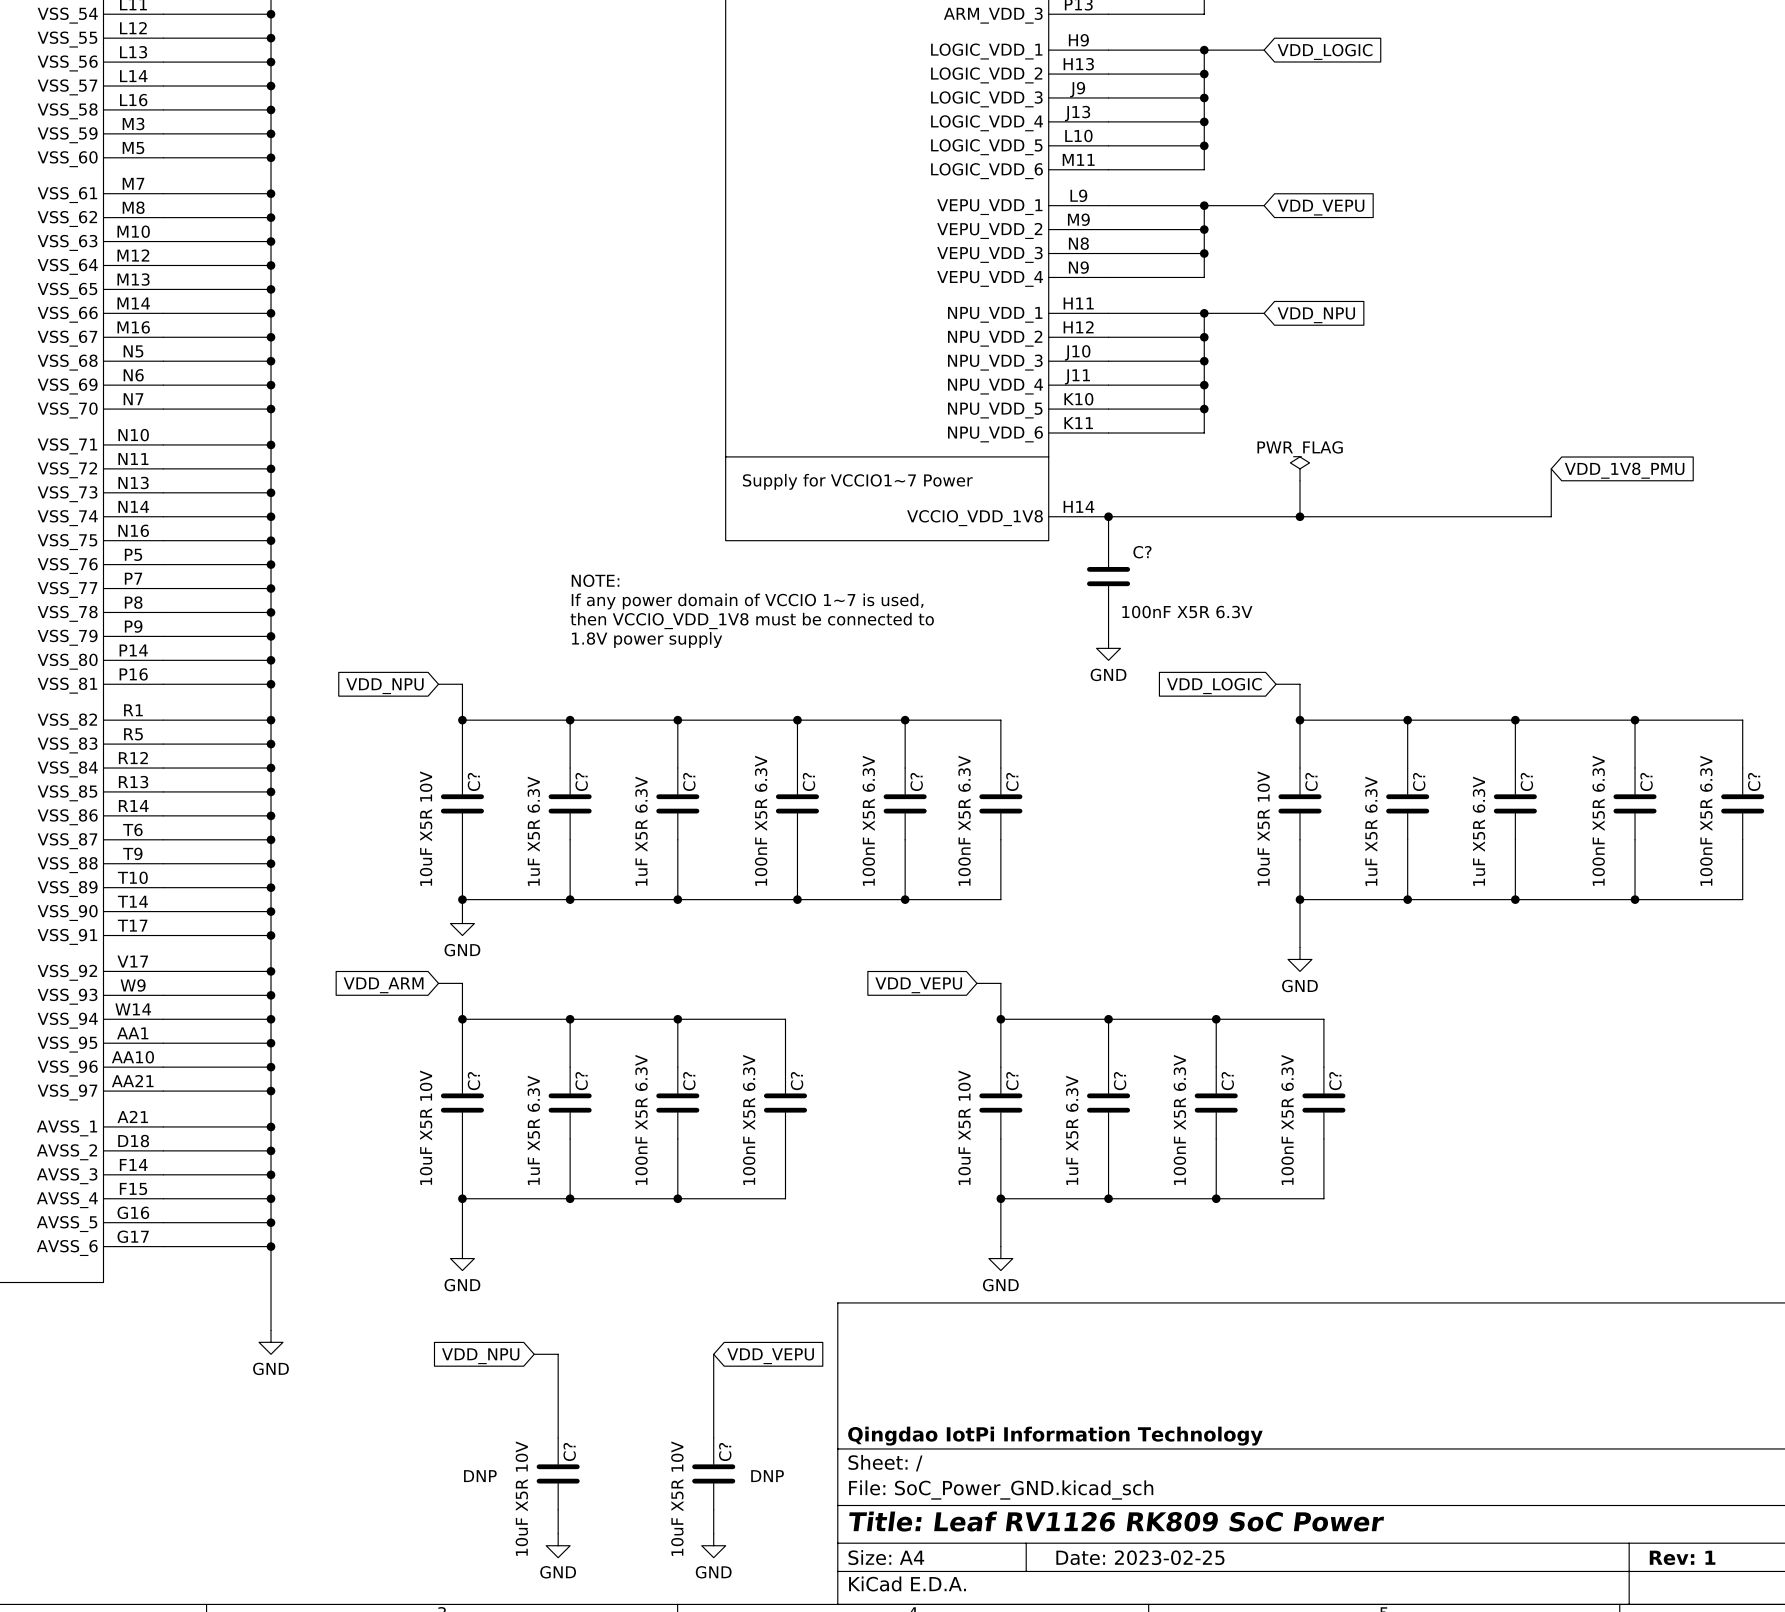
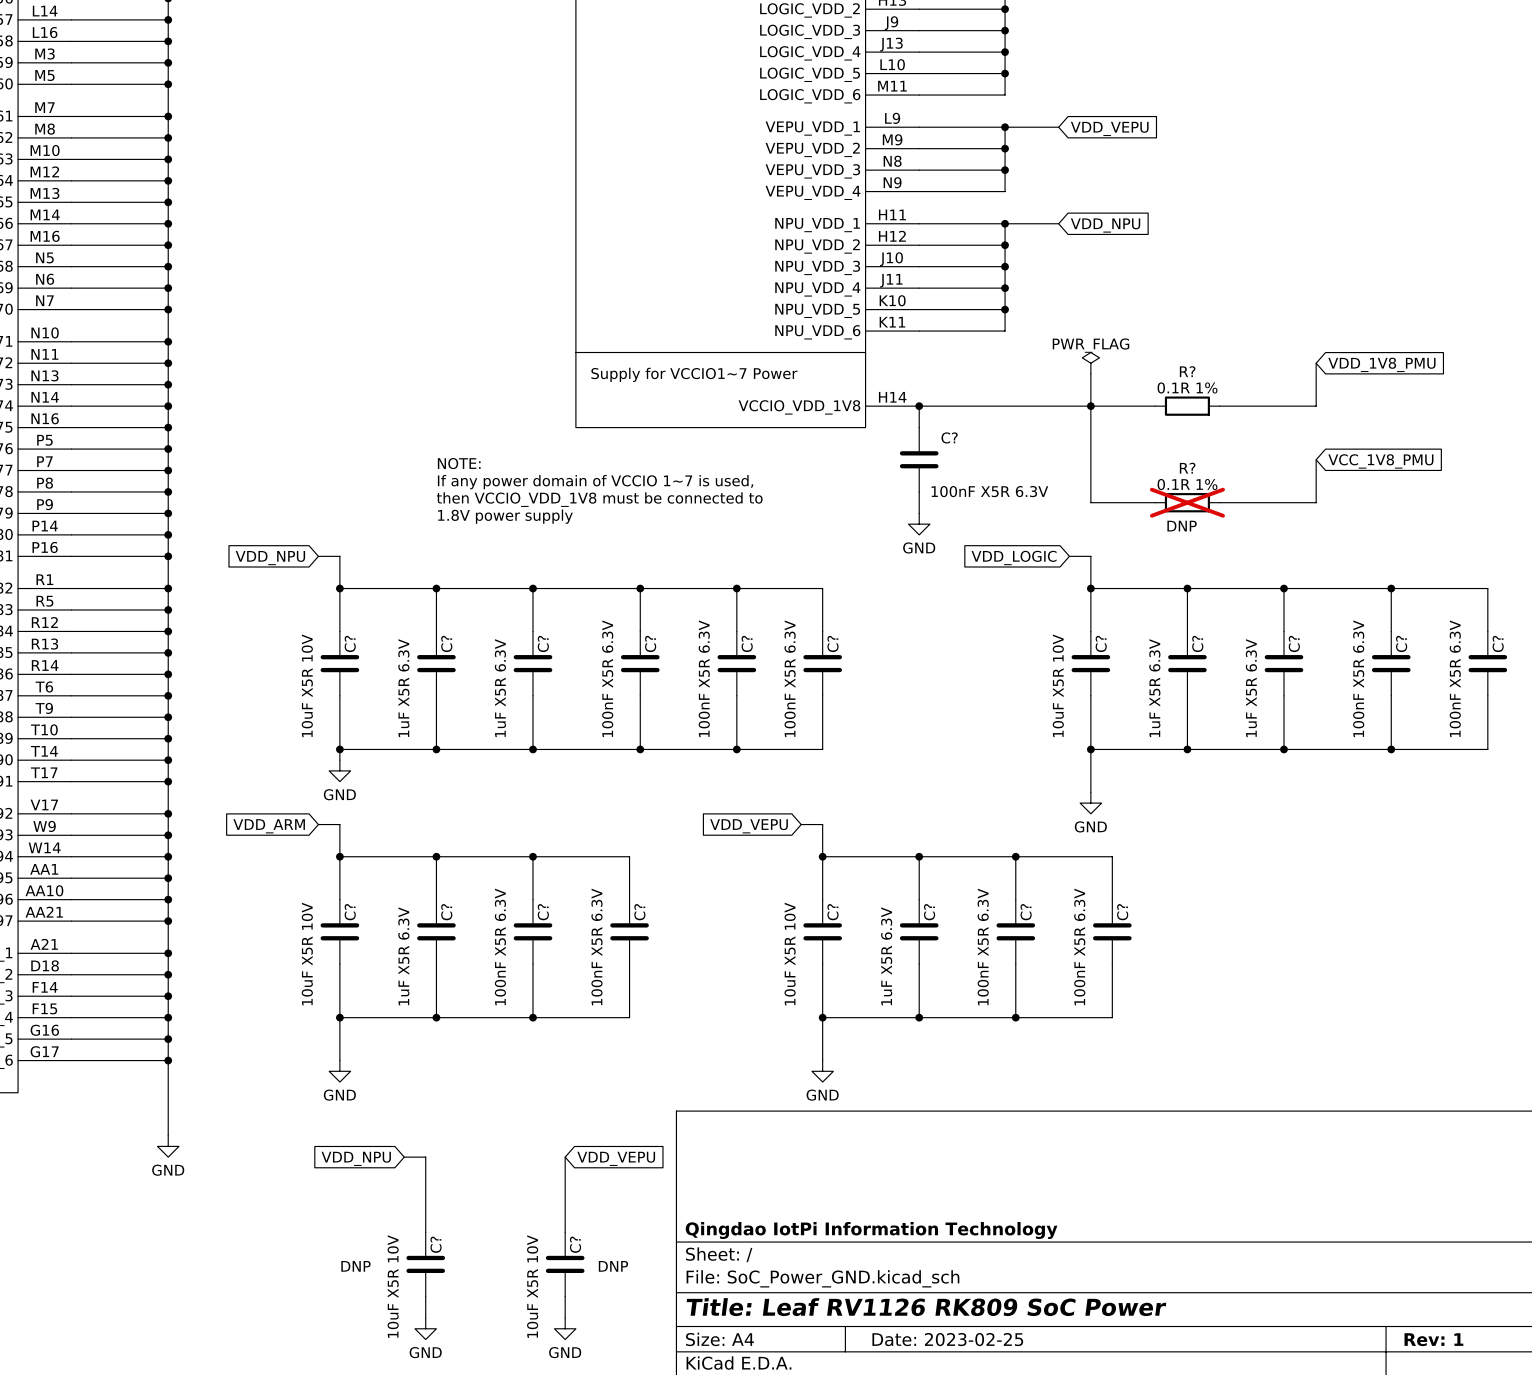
wire: none -> (1090, 406) (1090, 502) (1155, 502)
wire: (1371, 516) (1443, 516) -> none
R?: none -> 0.1R 1% (1187, 406)
wire: none -> (1316, 459) (1316, 502) (1219, 502)
global label: none -> VCC_1V8_PMU (1380, 461)
R?: none -> 0.1R 1% (1187, 502)
text: none -> DNP (1182, 526)

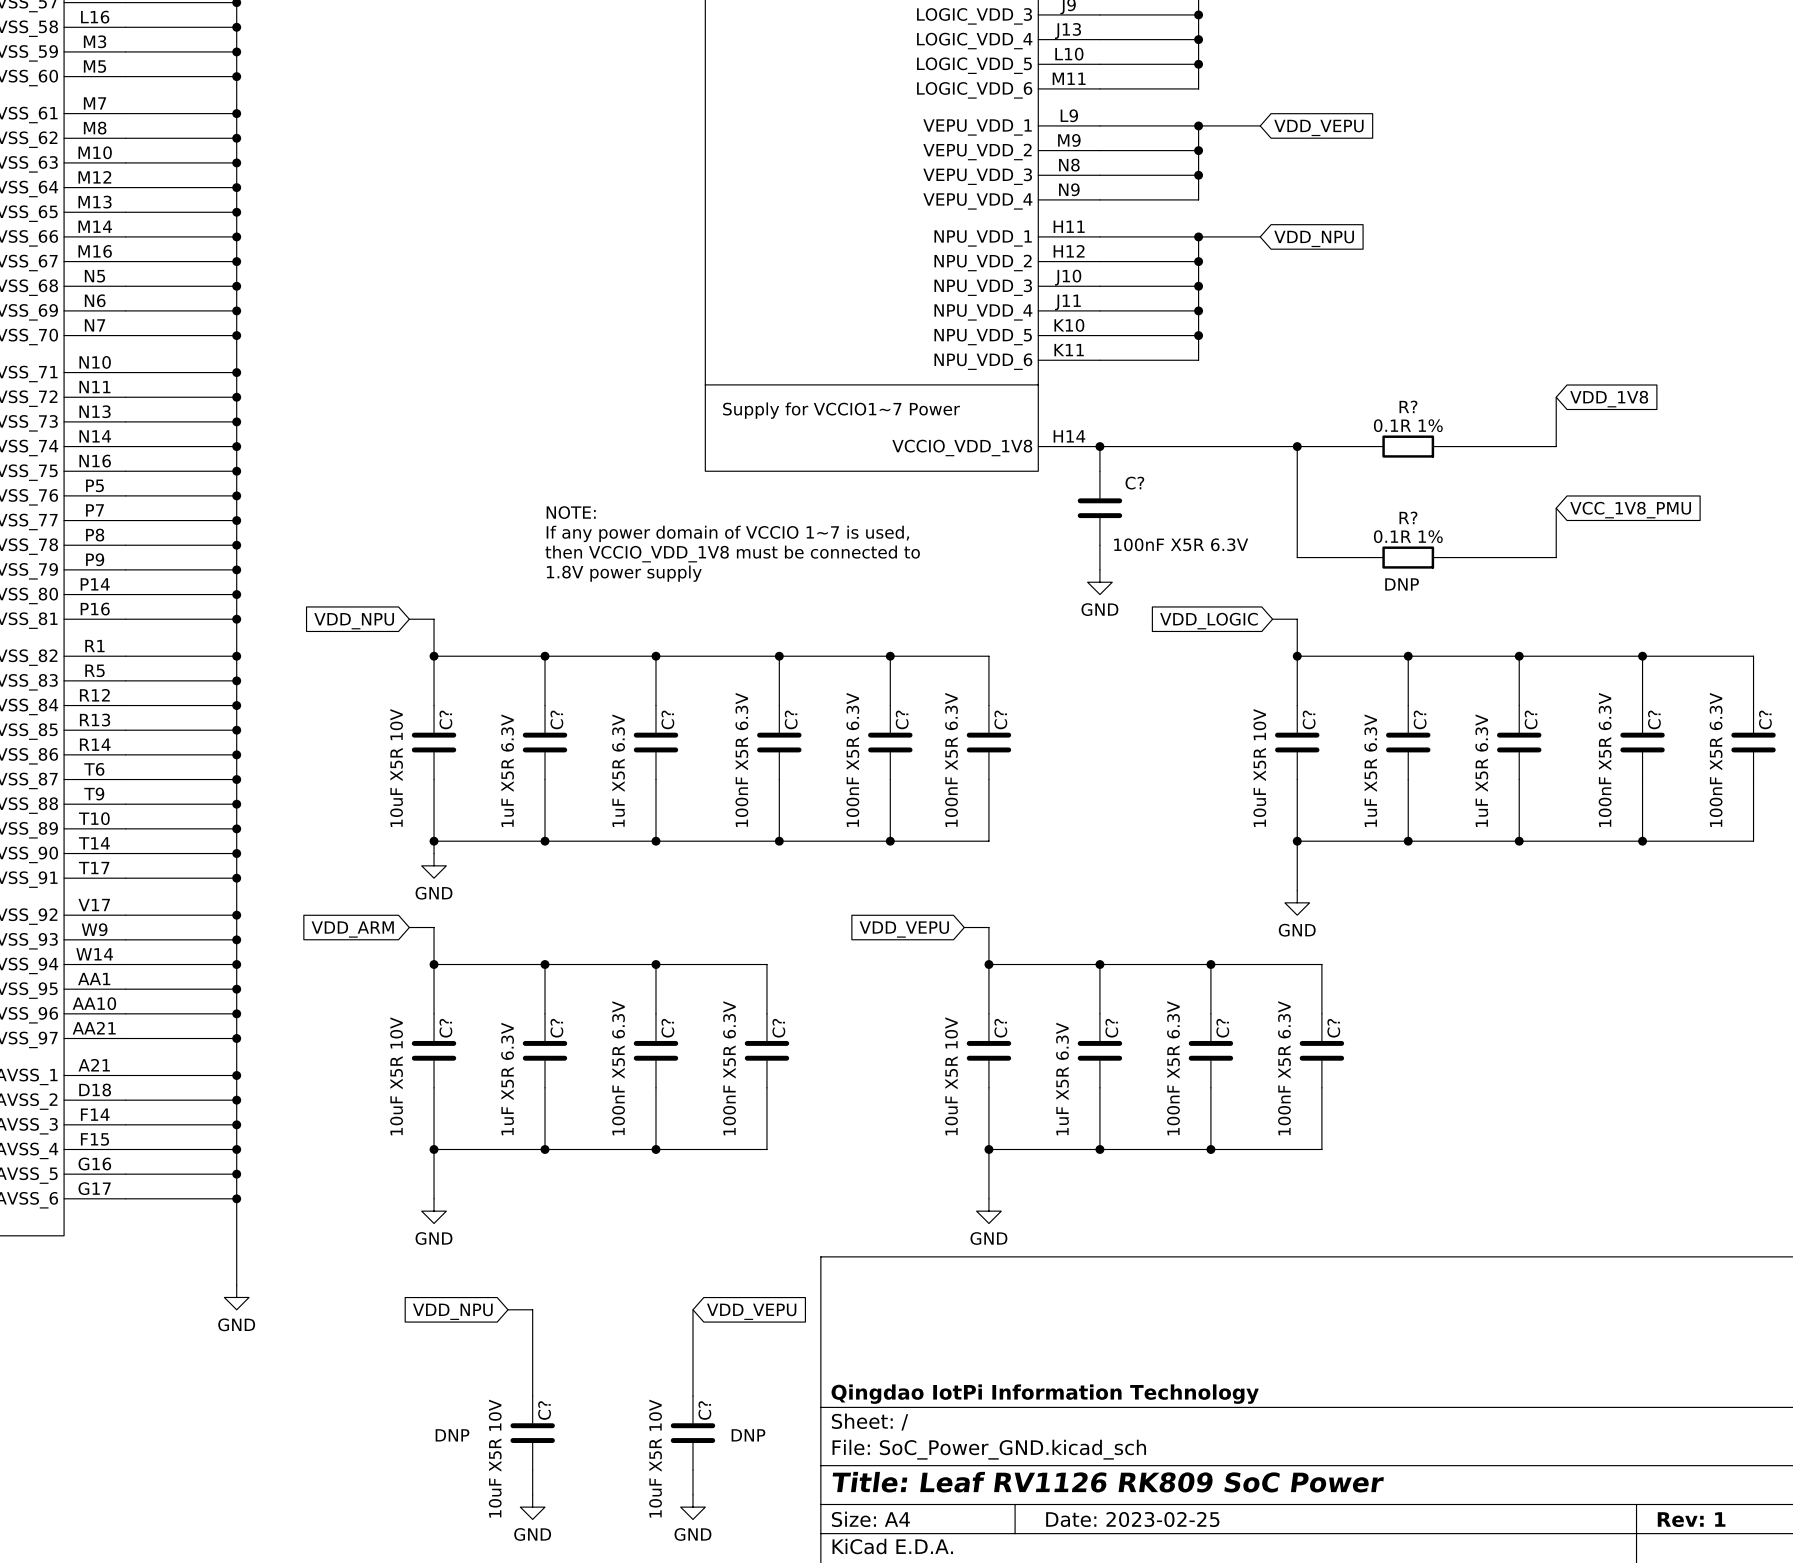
power symbol: PWR_FLAG (1090, 363) -> none
global label: VDD_1V8_PMU (1381, 364) -> VDD_1V8 (1609, 399)
wire: (1090, 373) (1090, 406) -> none
R? do-not-place cross: (1187, 502) -> none

